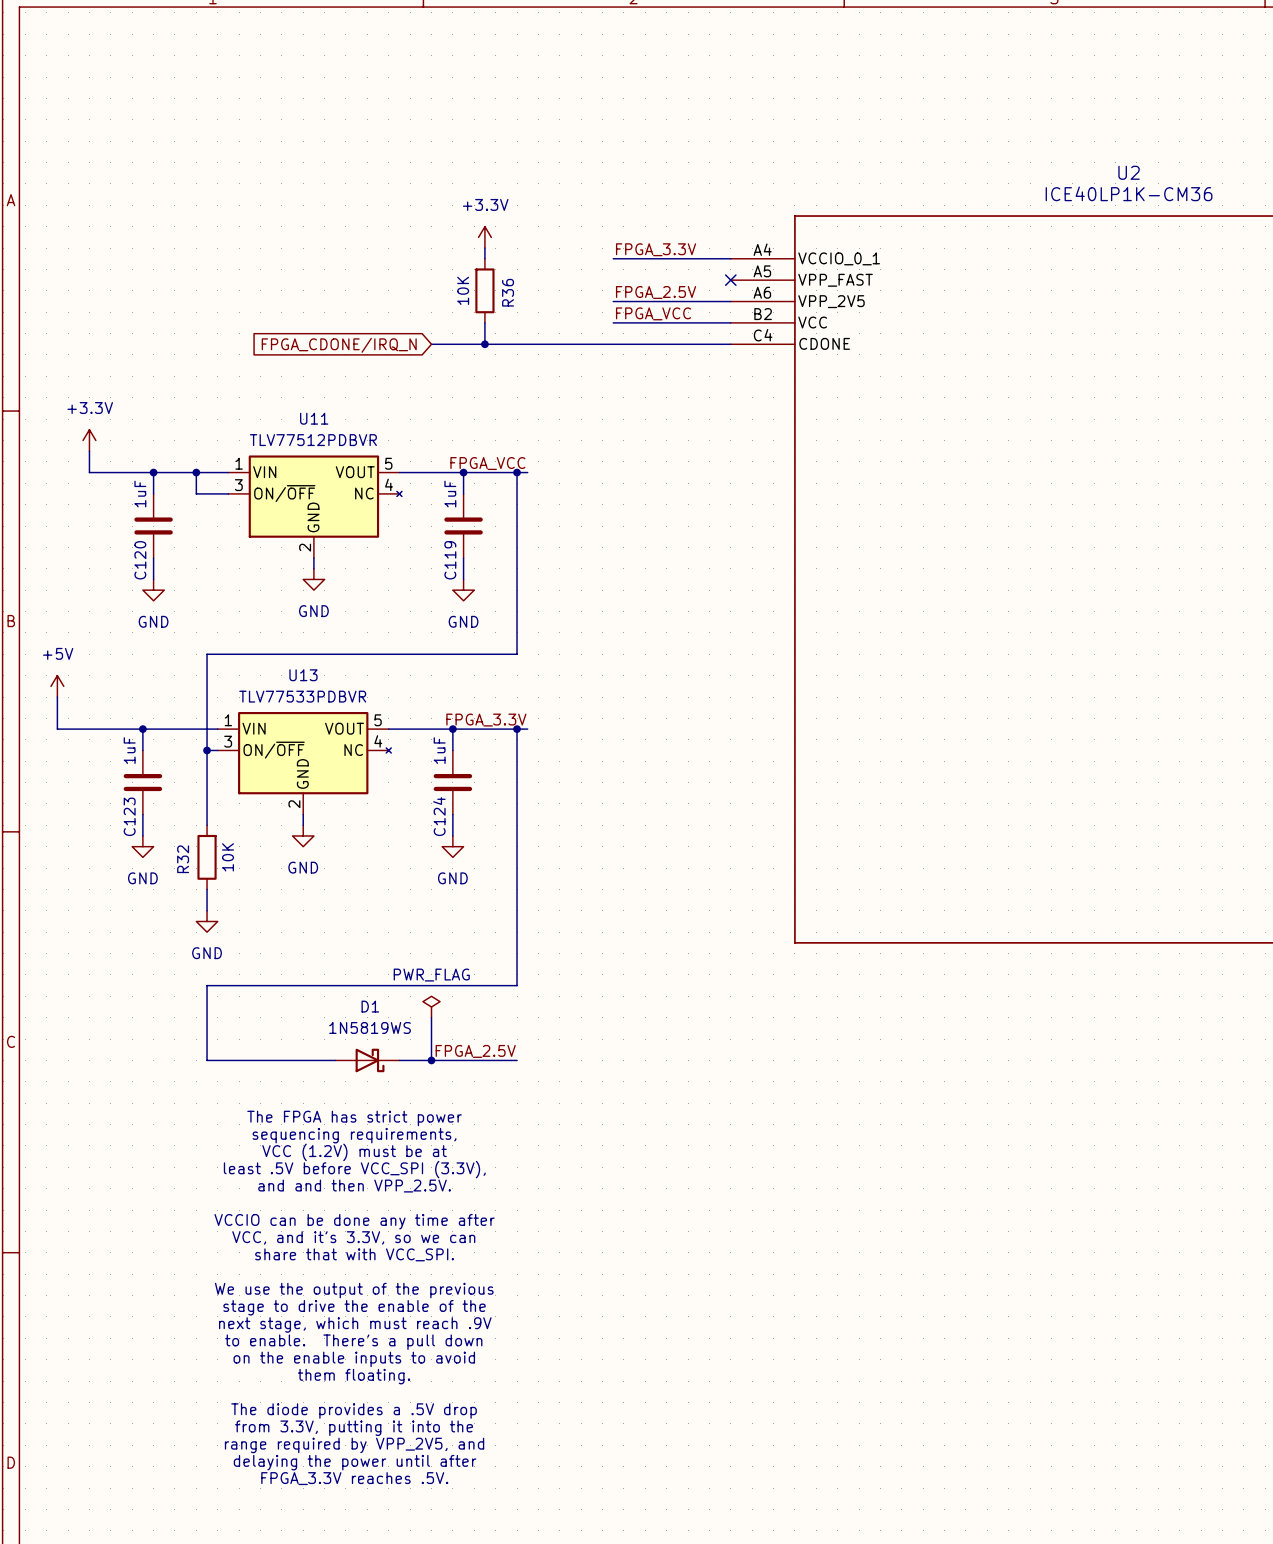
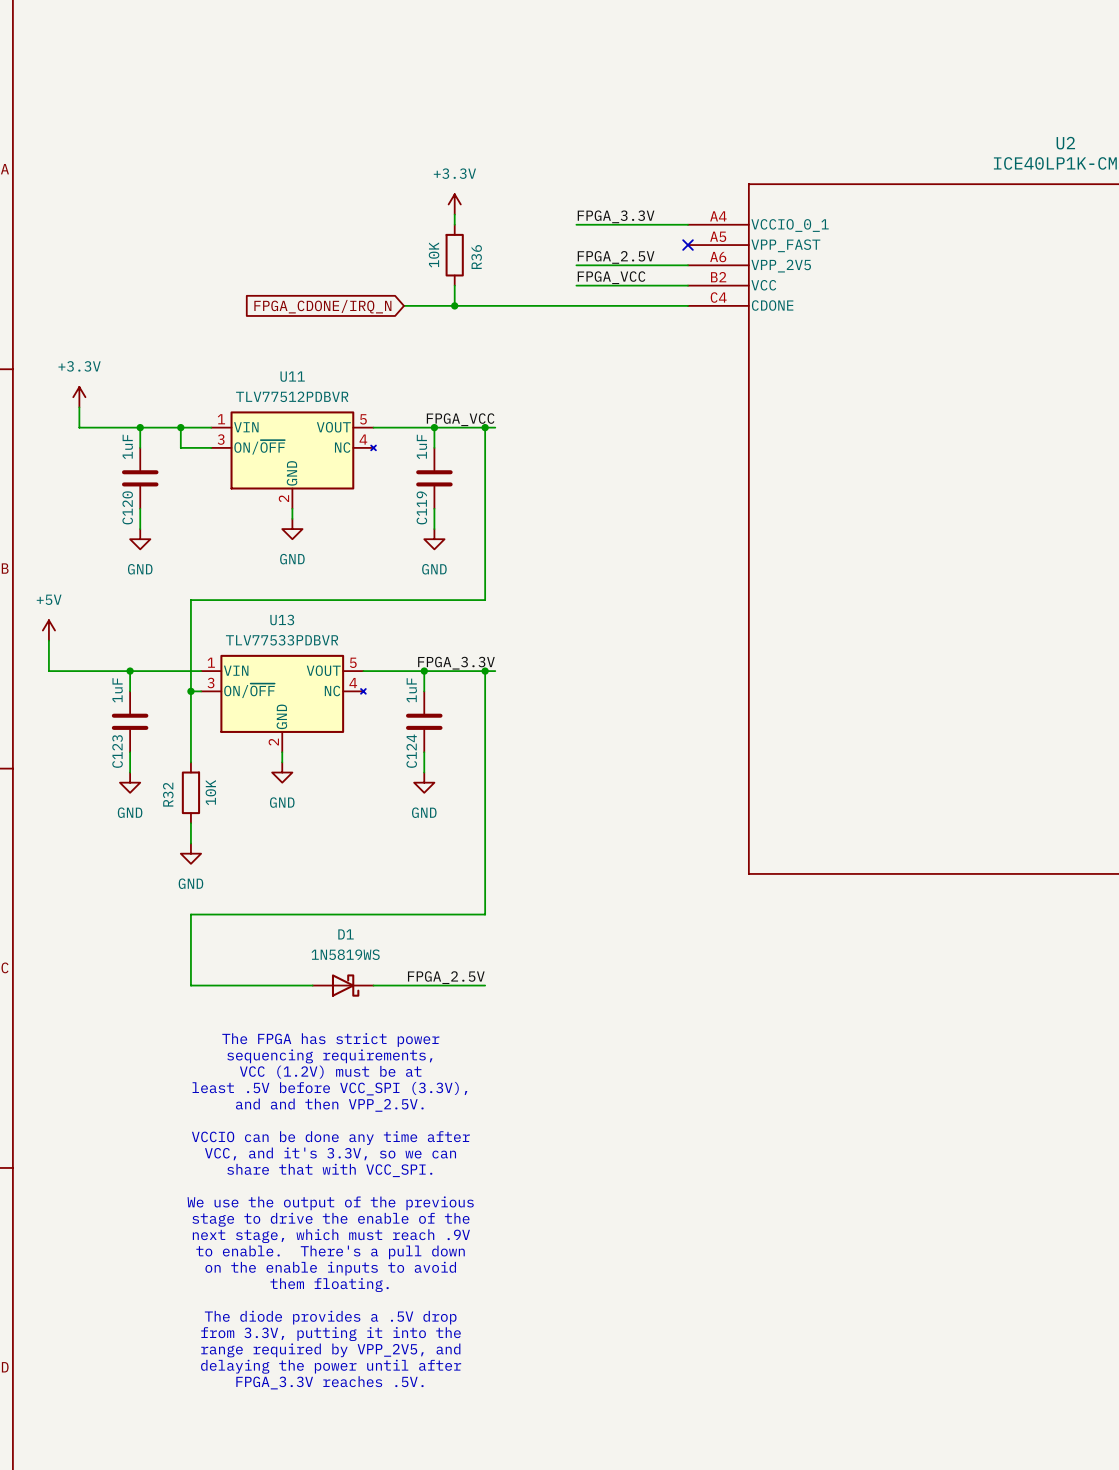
power symbol: PWR_FLAG (431, 1007) -> none
wire: (431, 1017) (431, 1060) -> none
junction: (431, 1060) -> none

